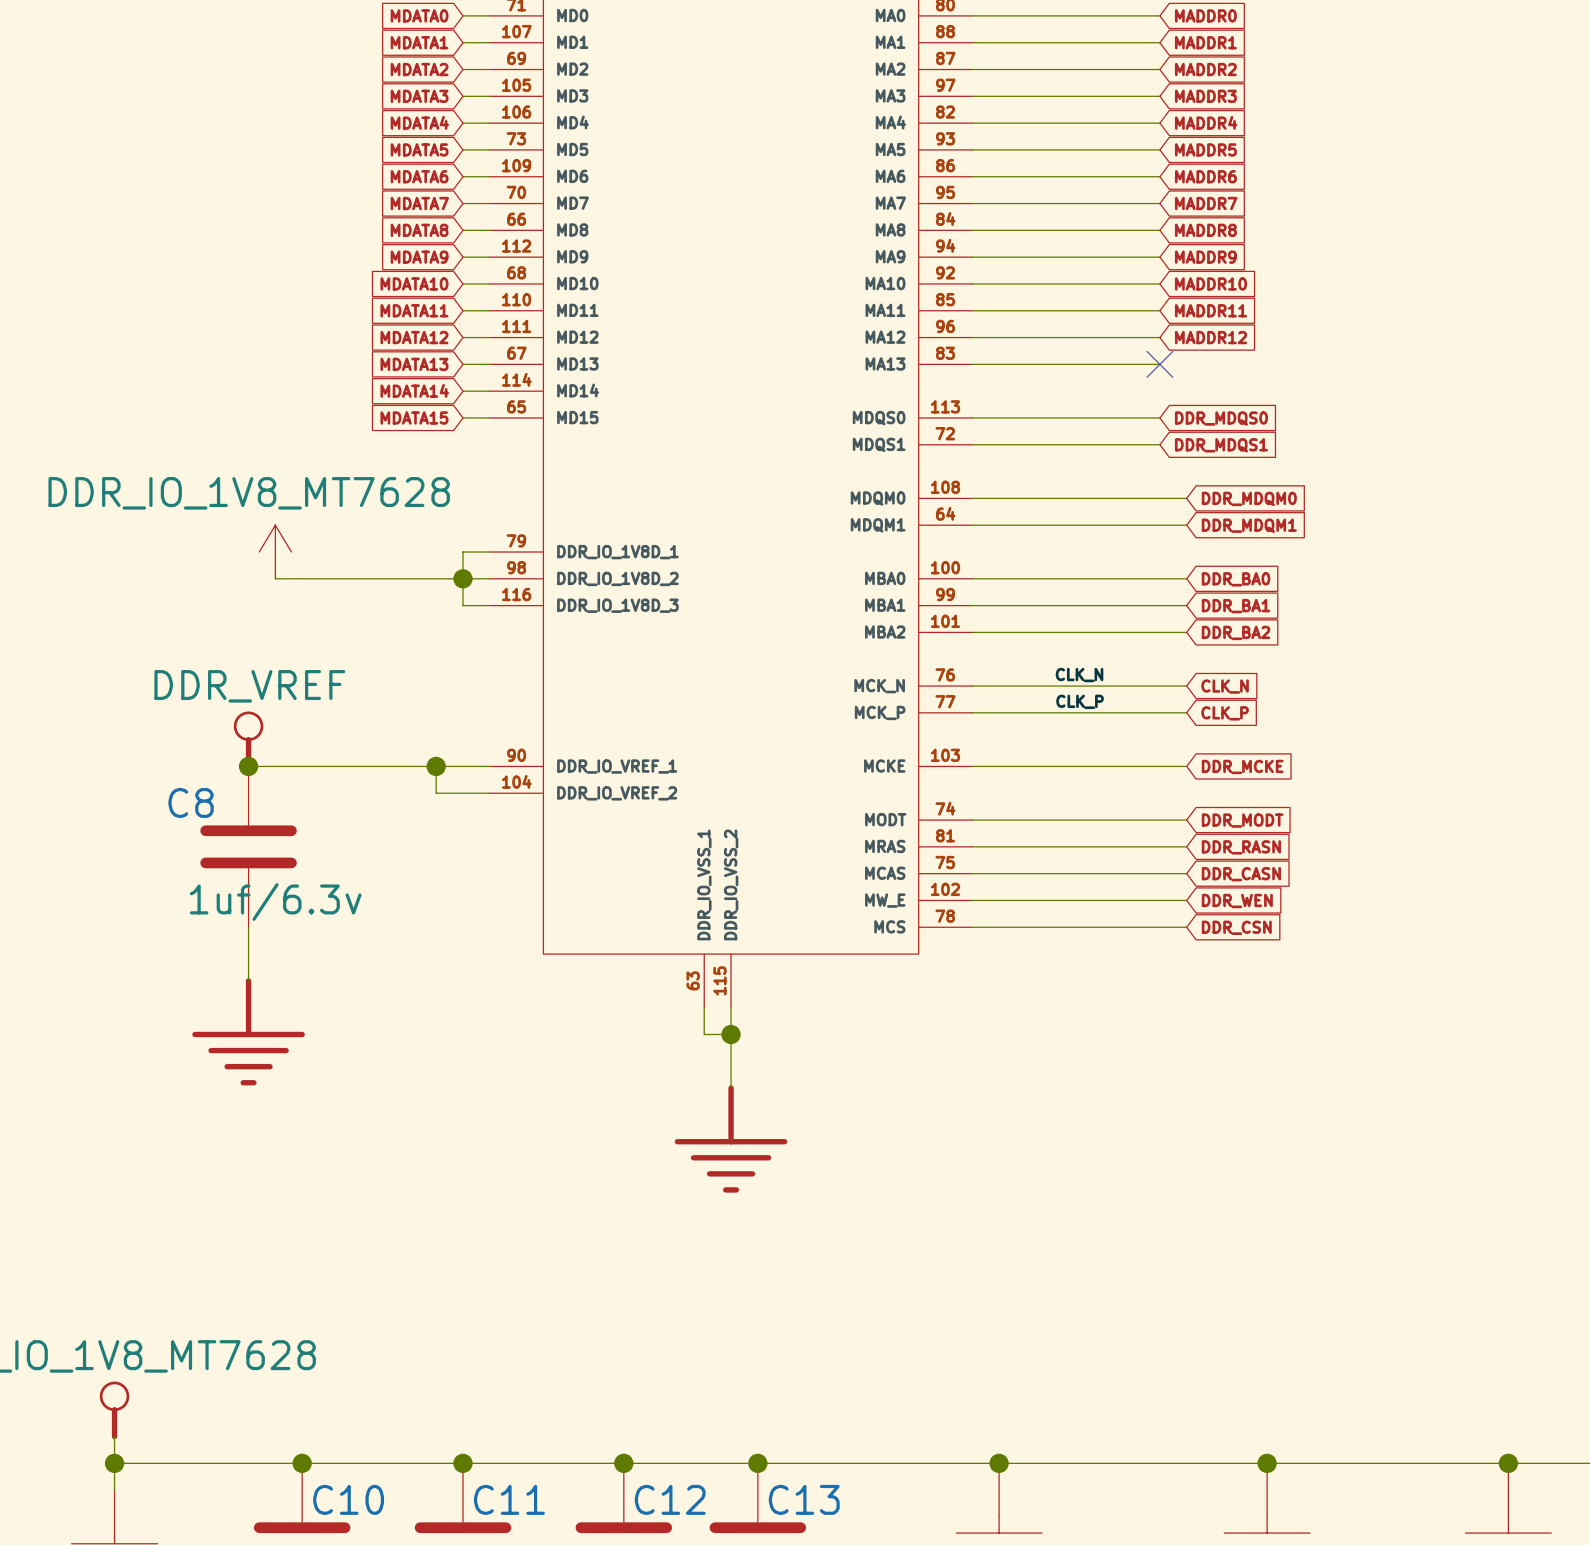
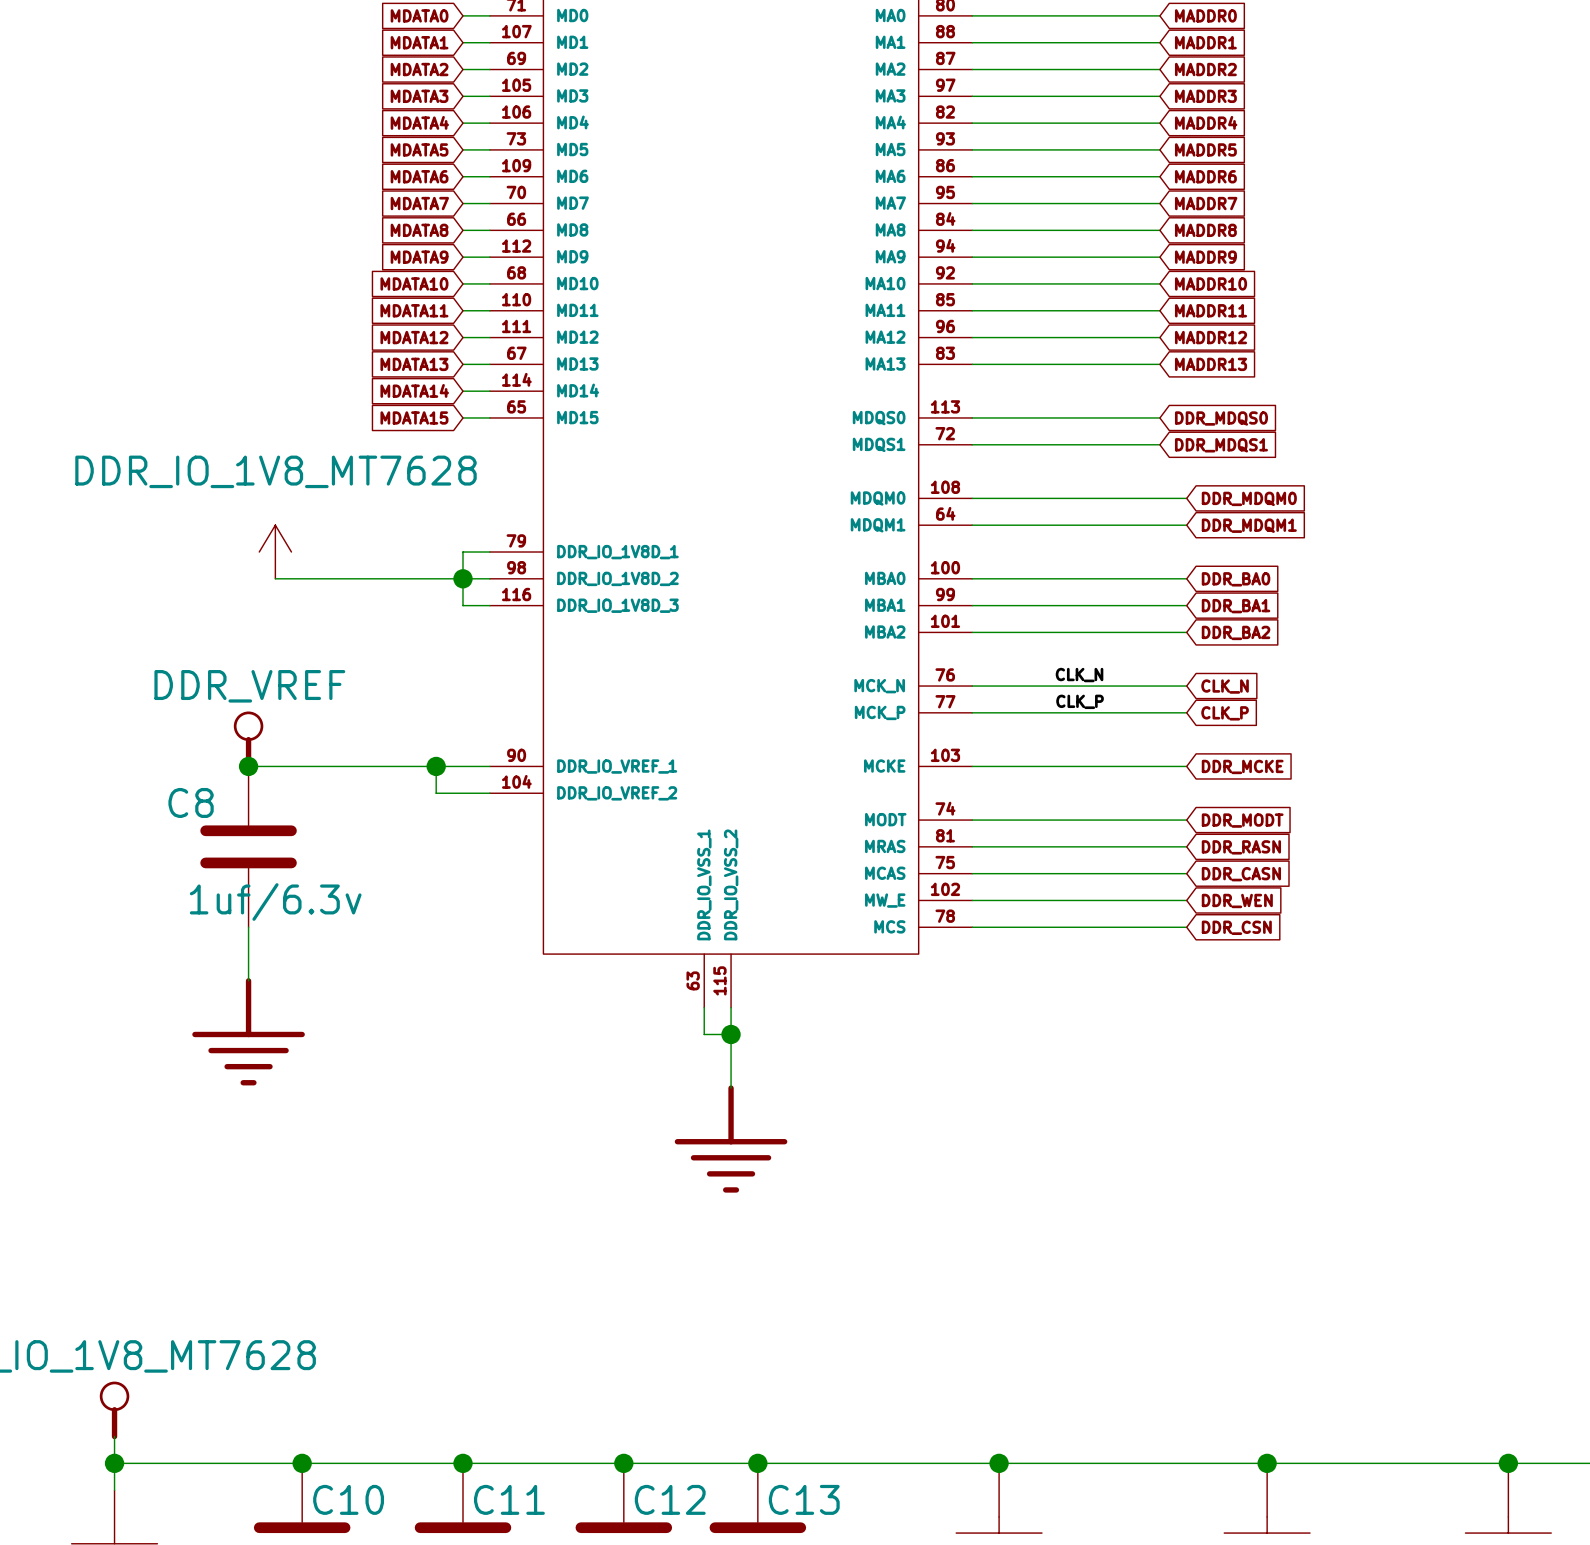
no-connect mark: (1159, 364) -> none
global label: none -> MADDR13 (1211, 364)
power symbol text position: DDR_IO_1V8_MT7628 (249, 493) -> DDR_IO_1V8_MT7628 (276, 471)

